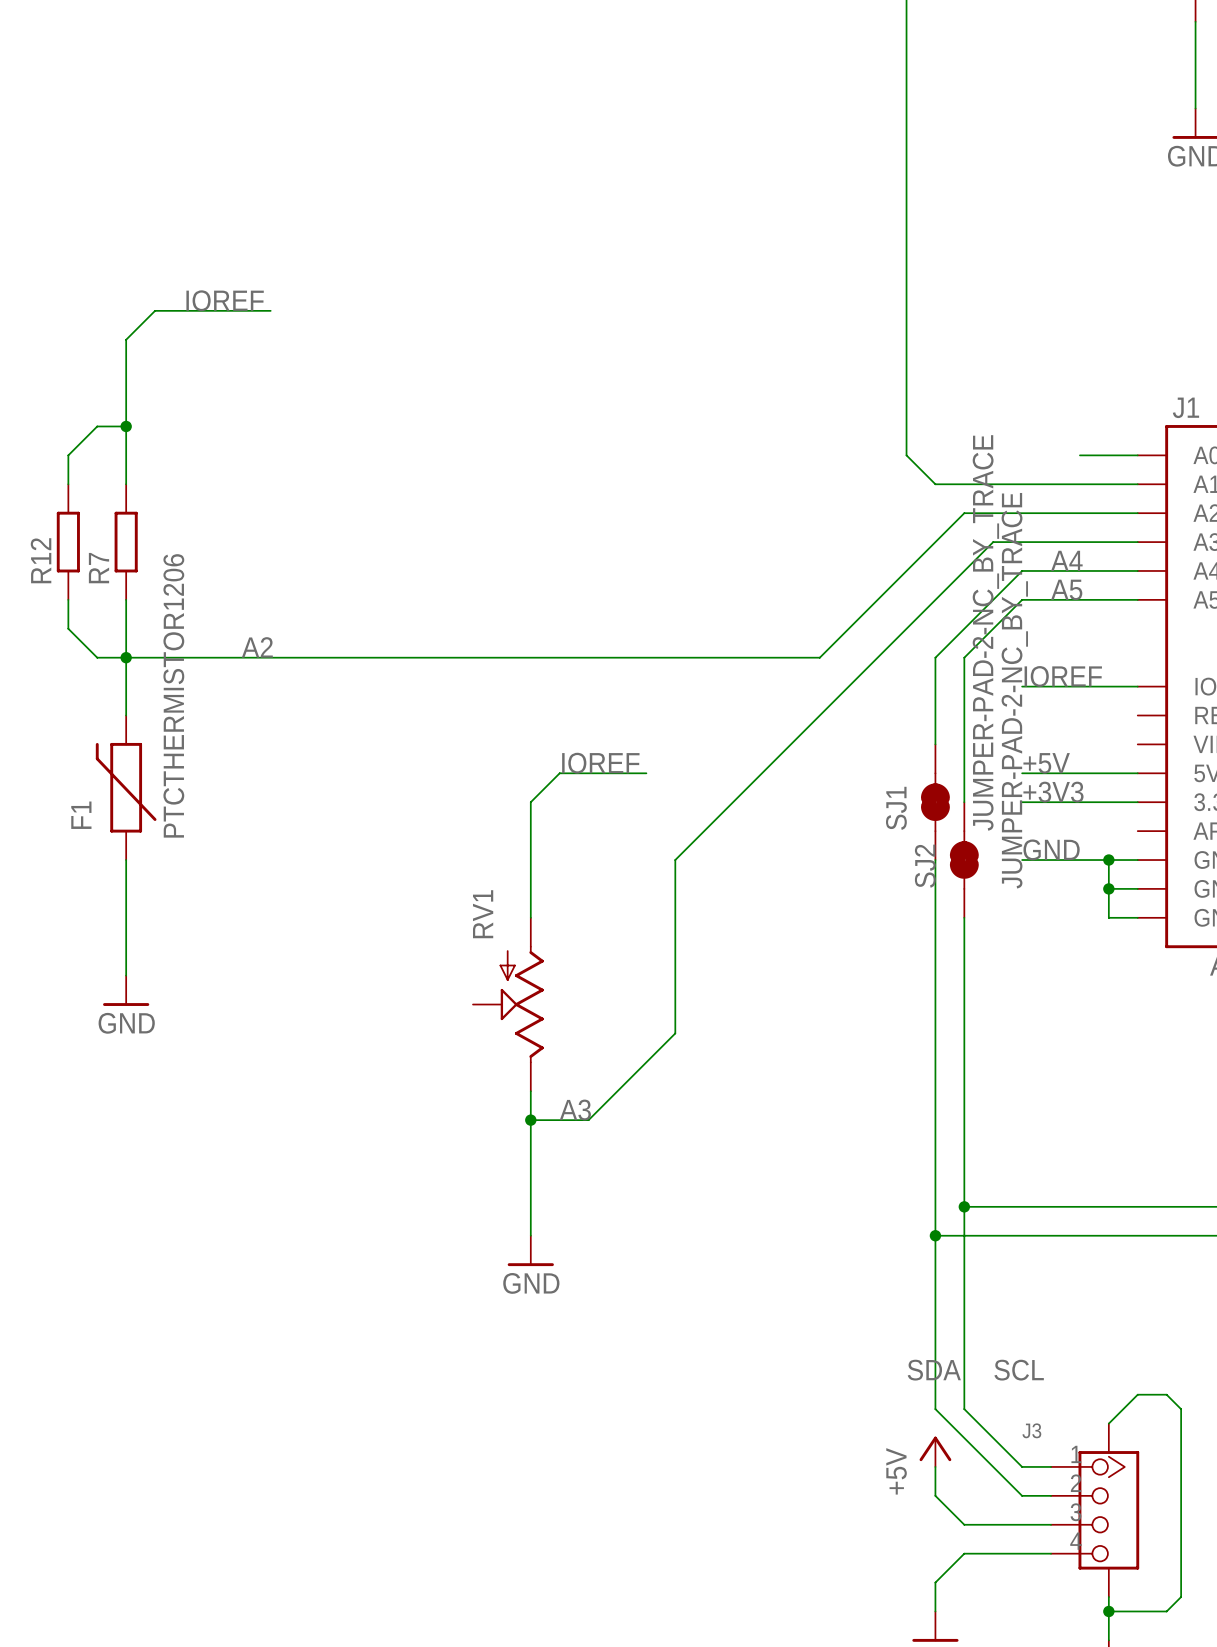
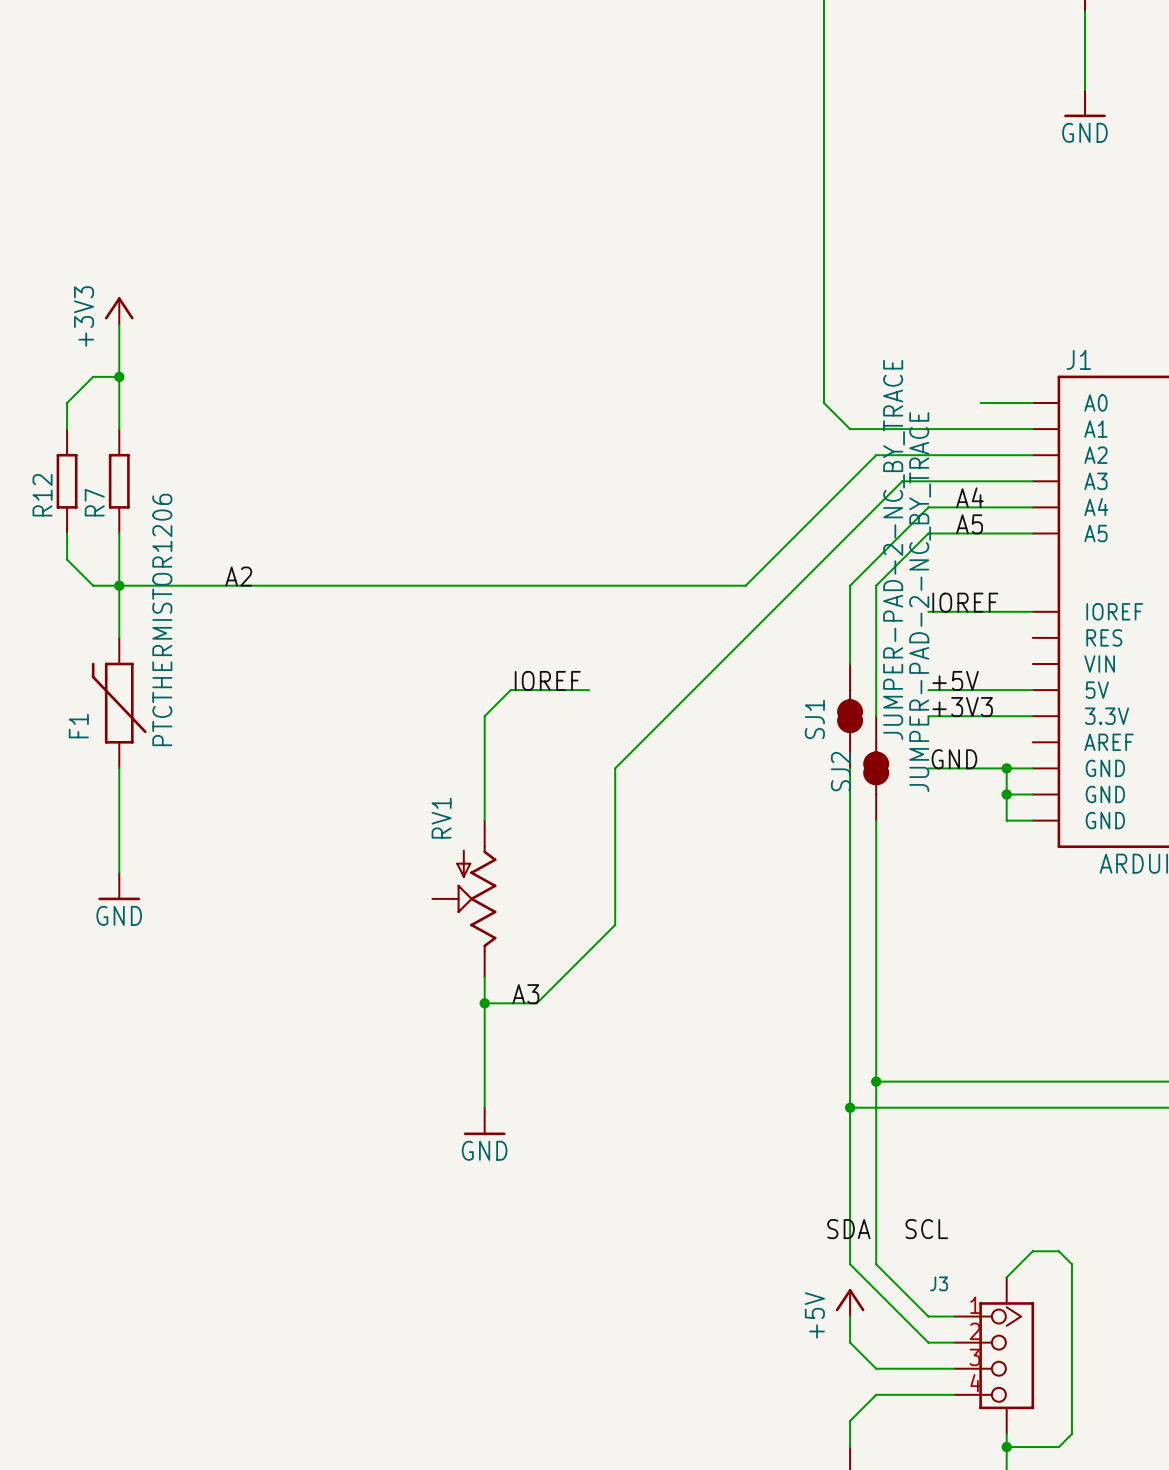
label: IOREF (225, 300) -> none
wire: (270, 310) (155, 310) (126, 339) (126, 368) -> none
power symbol: none -> +3V3 (119, 310)

